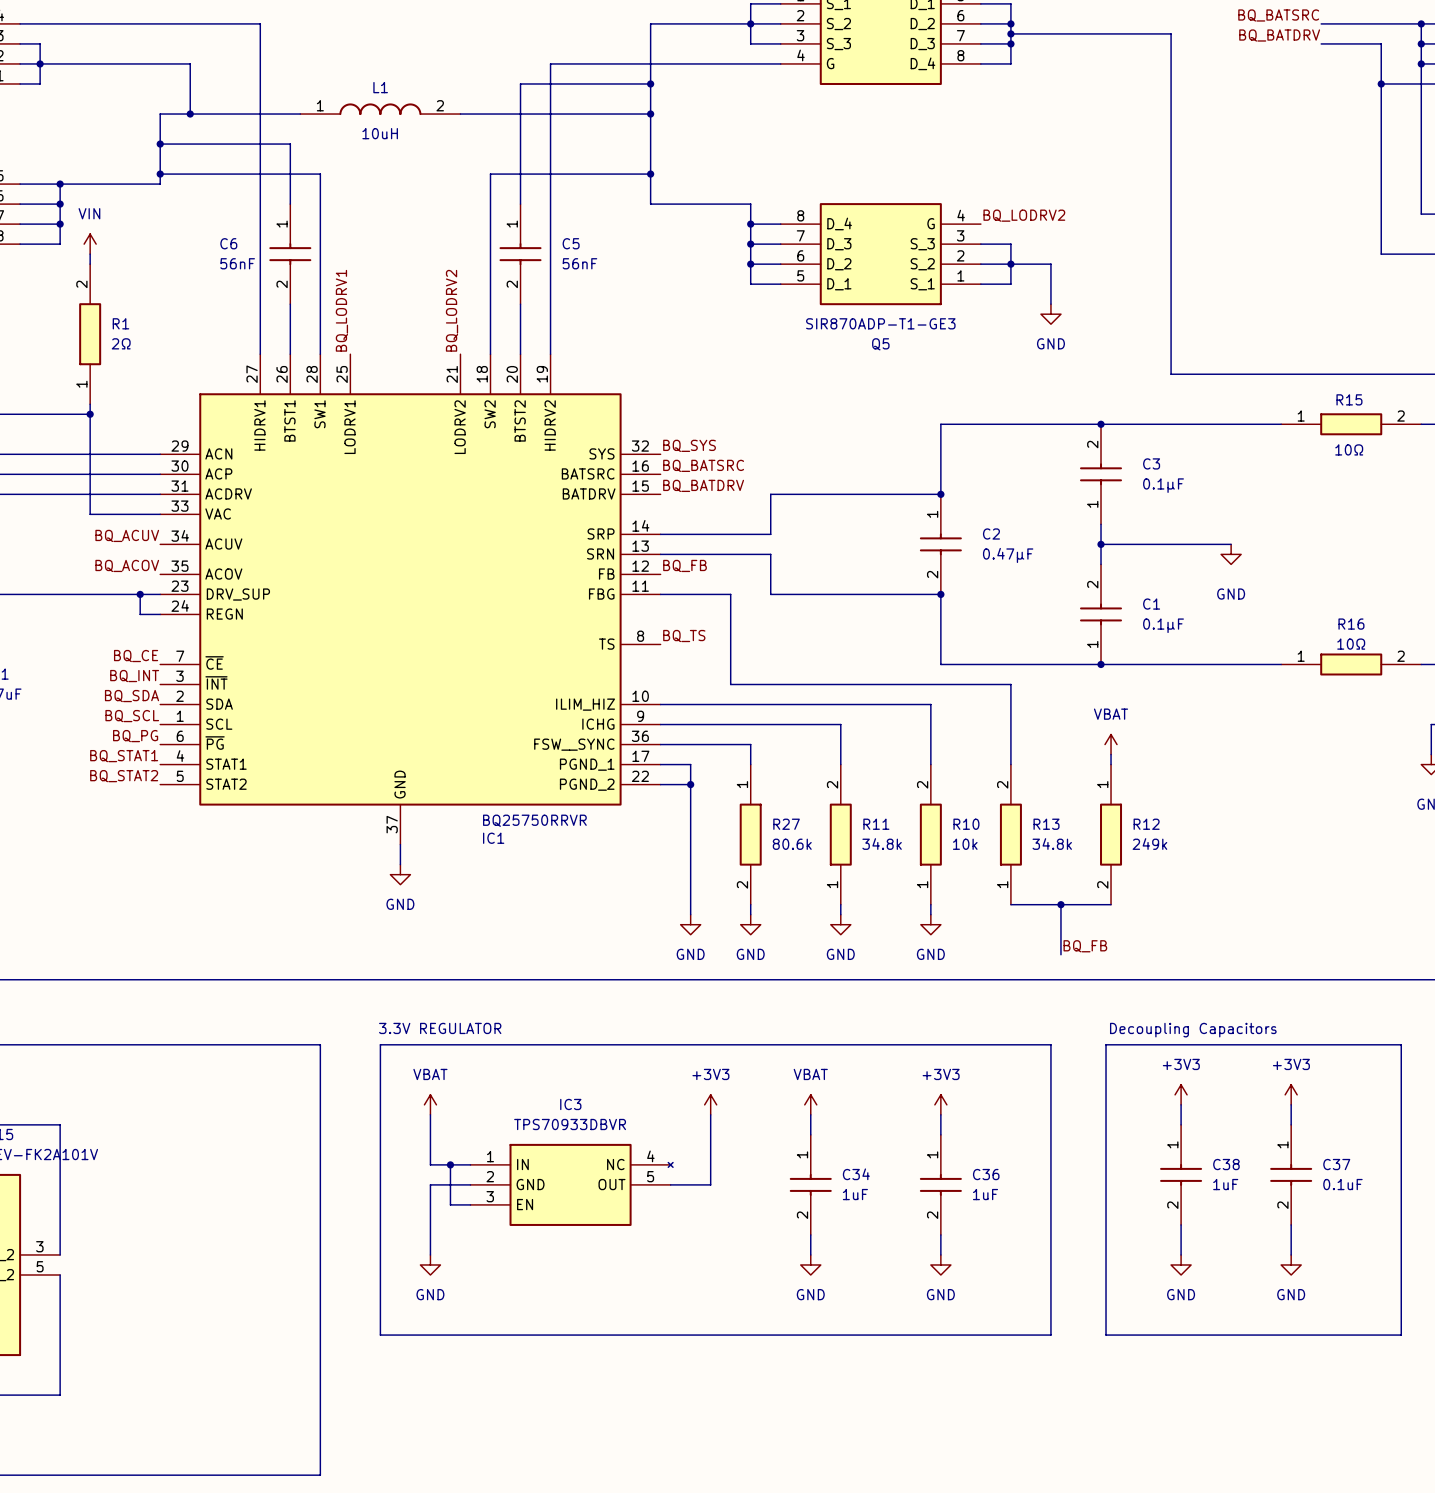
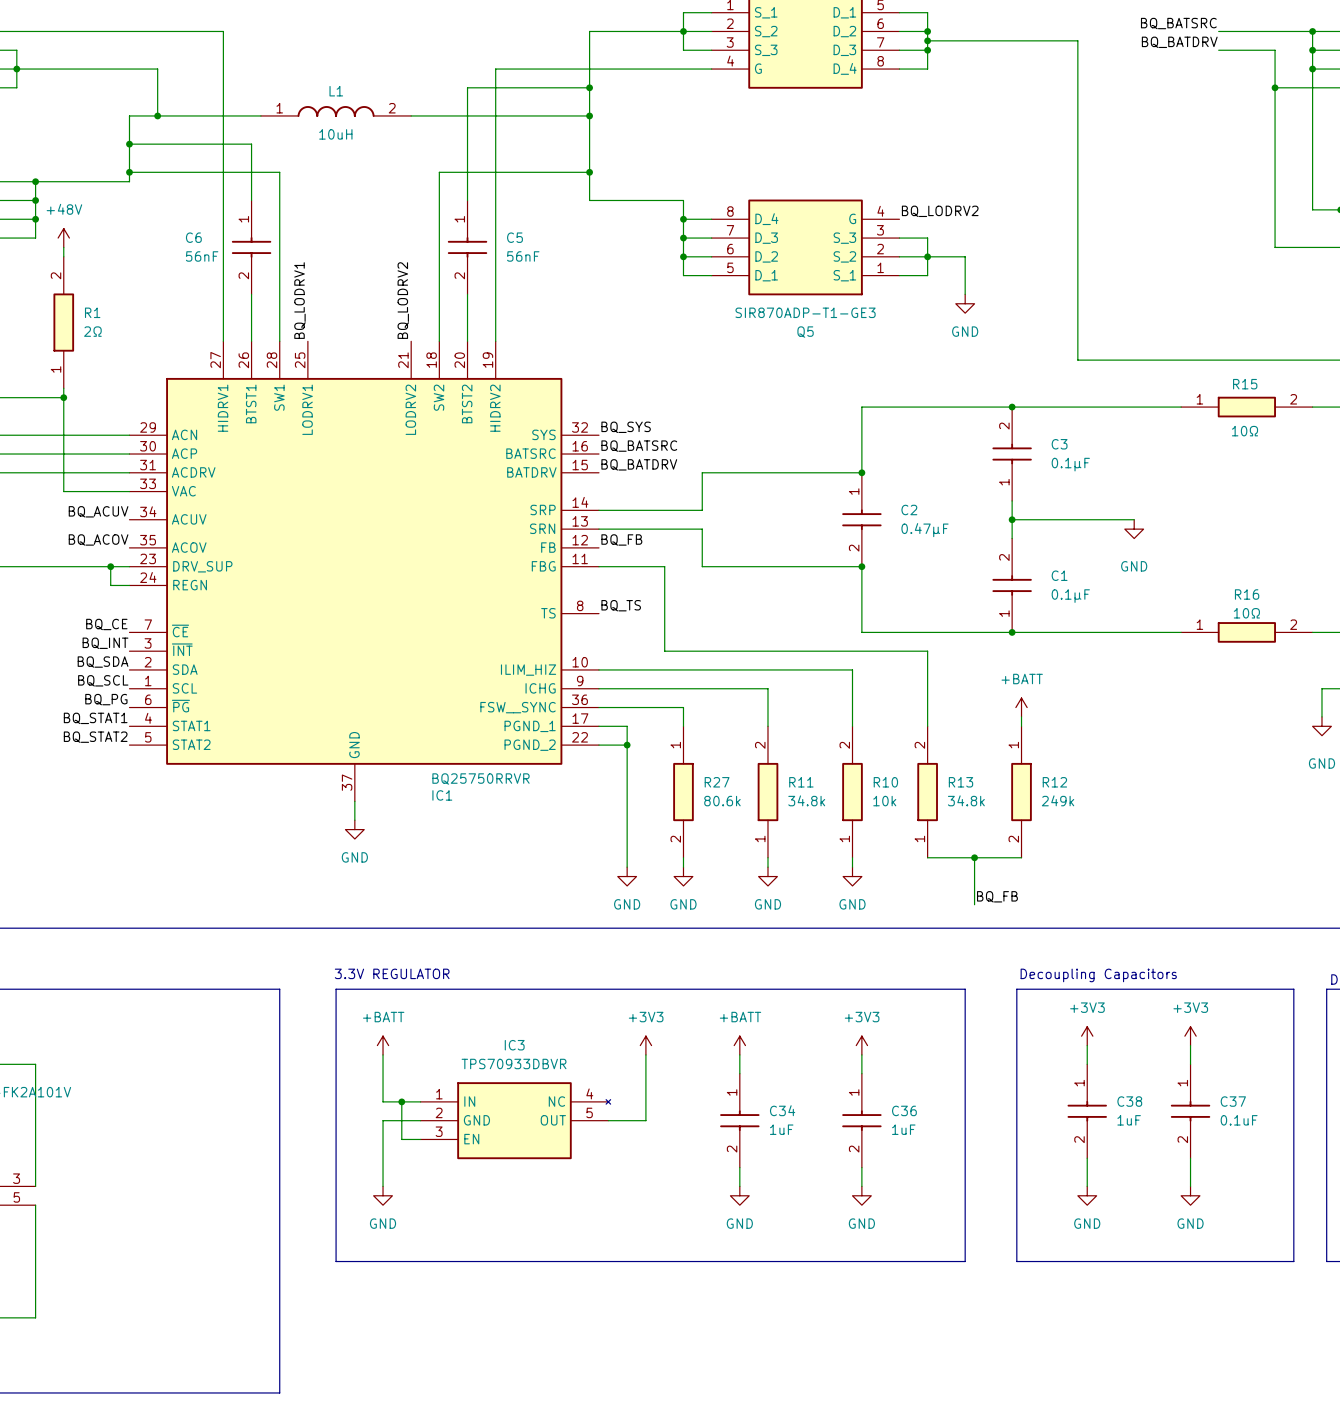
power symbol: VIN (90, 244) -> +48V (63, 238)
power symbol: VBAT (1111, 744) -> +BATT (1021, 707)
power symbol: VBAT (430, 1104) -> +BATT (383, 1045)
power symbol: VBAT (810, 1104) -> +BATT (739, 1045)

